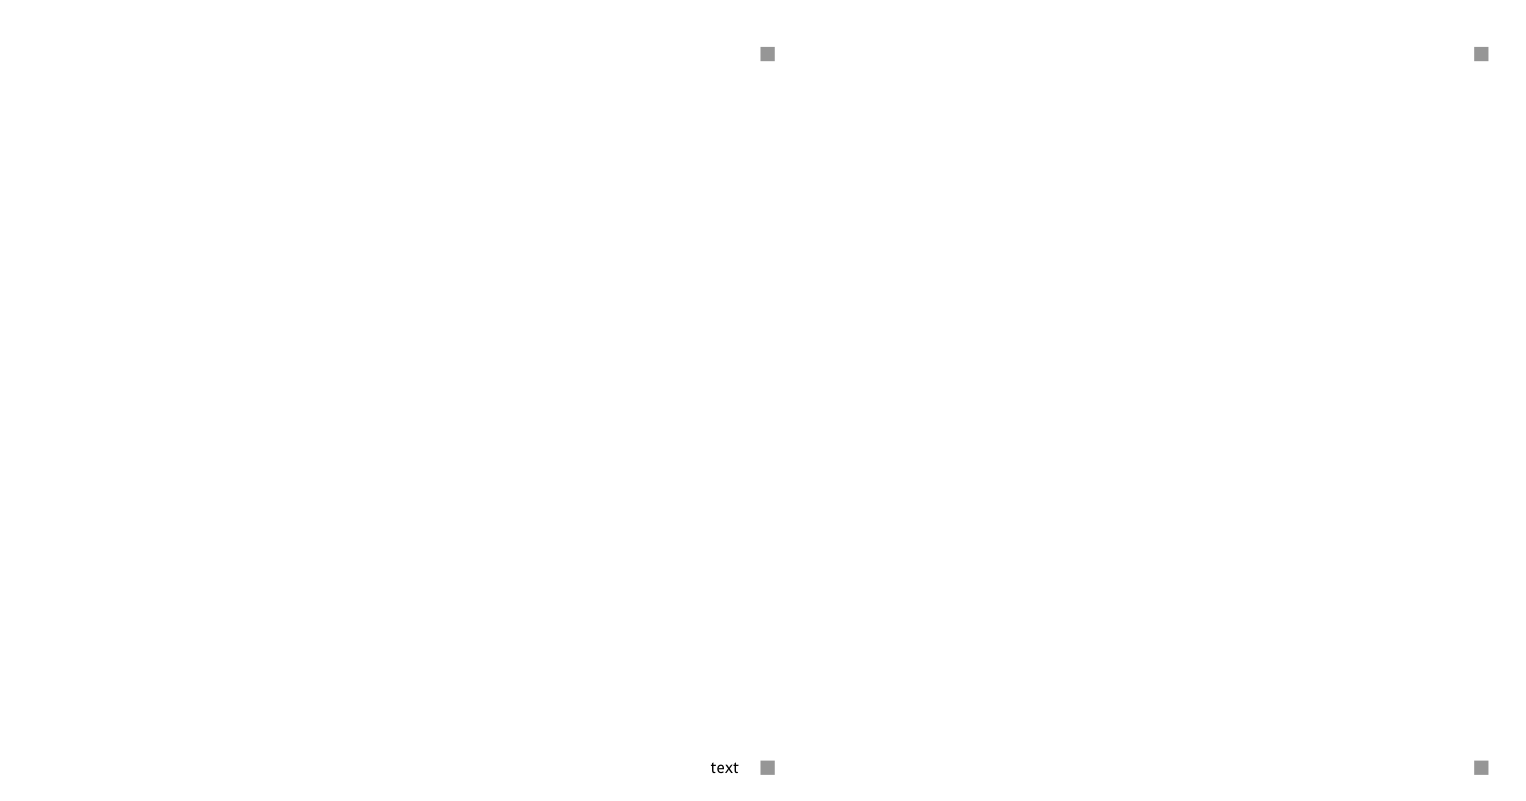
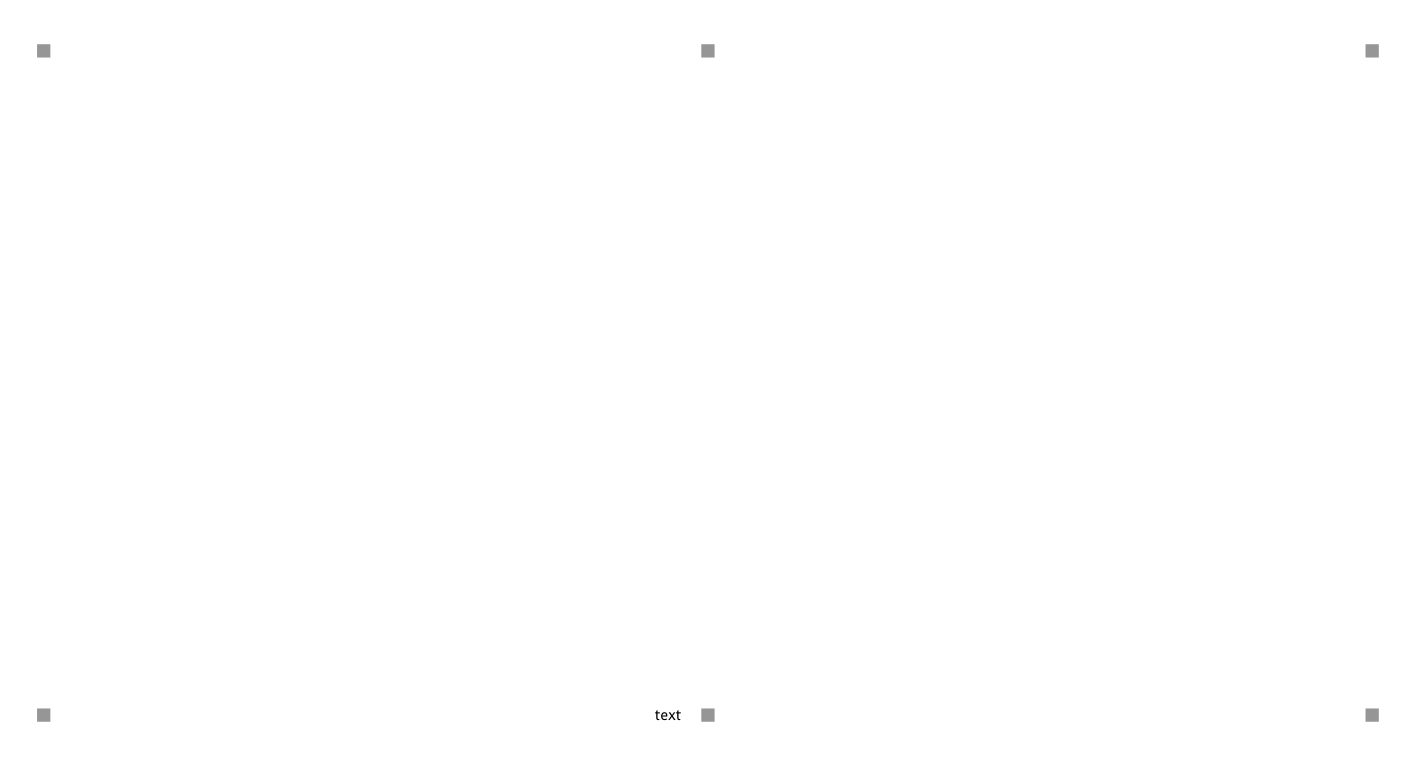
part: none -> (43, 50)
part: none -> (43, 715)

